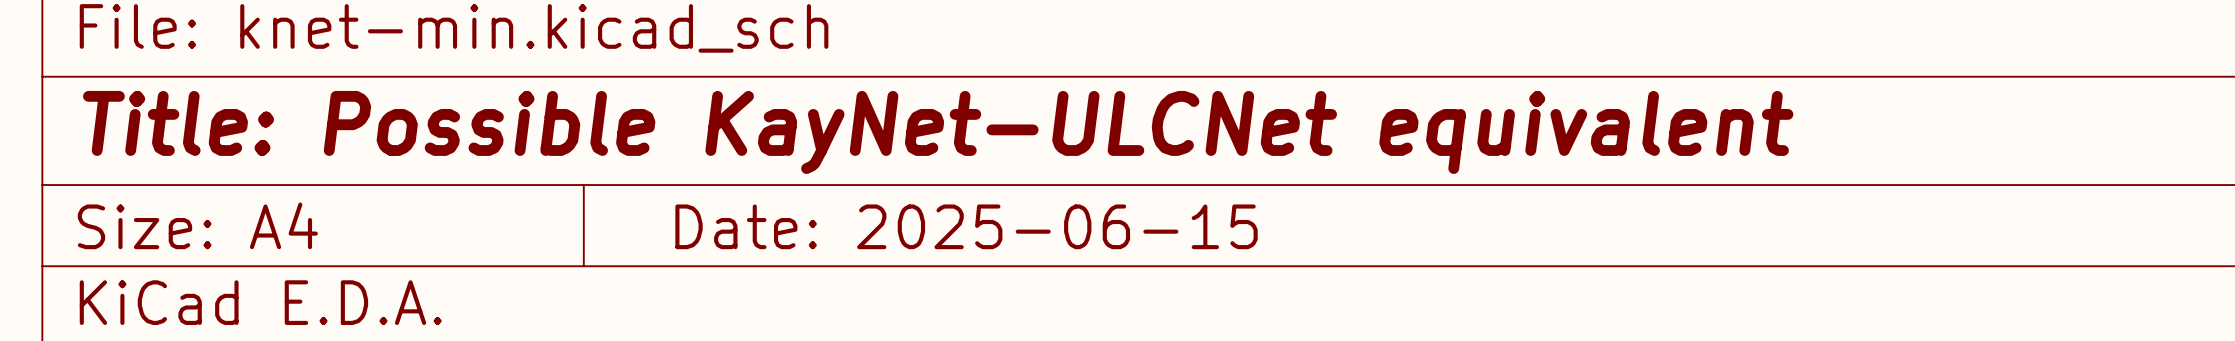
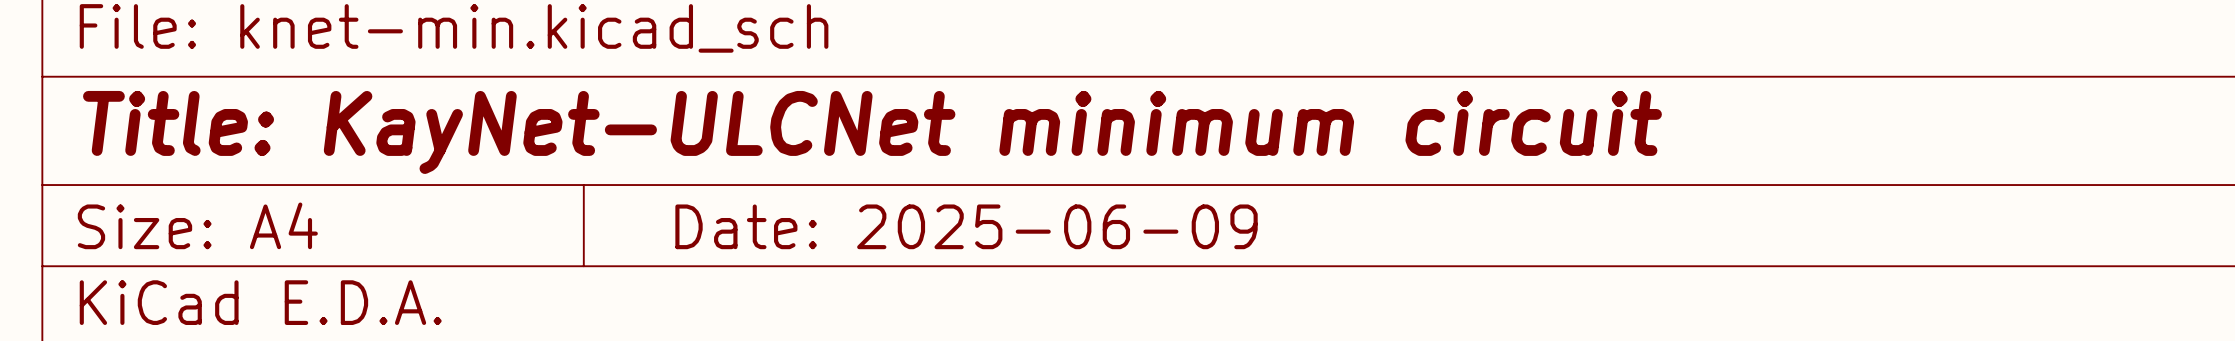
title block: Title: Possible KayNet-ULCNet equivalent (938, 132) -> Title: KayNet-ULCNet minimum circuit (872, 132)
title block: Date: 2025-06-15 (966, 226) -> Date: 2025-06-09 (966, 226)

